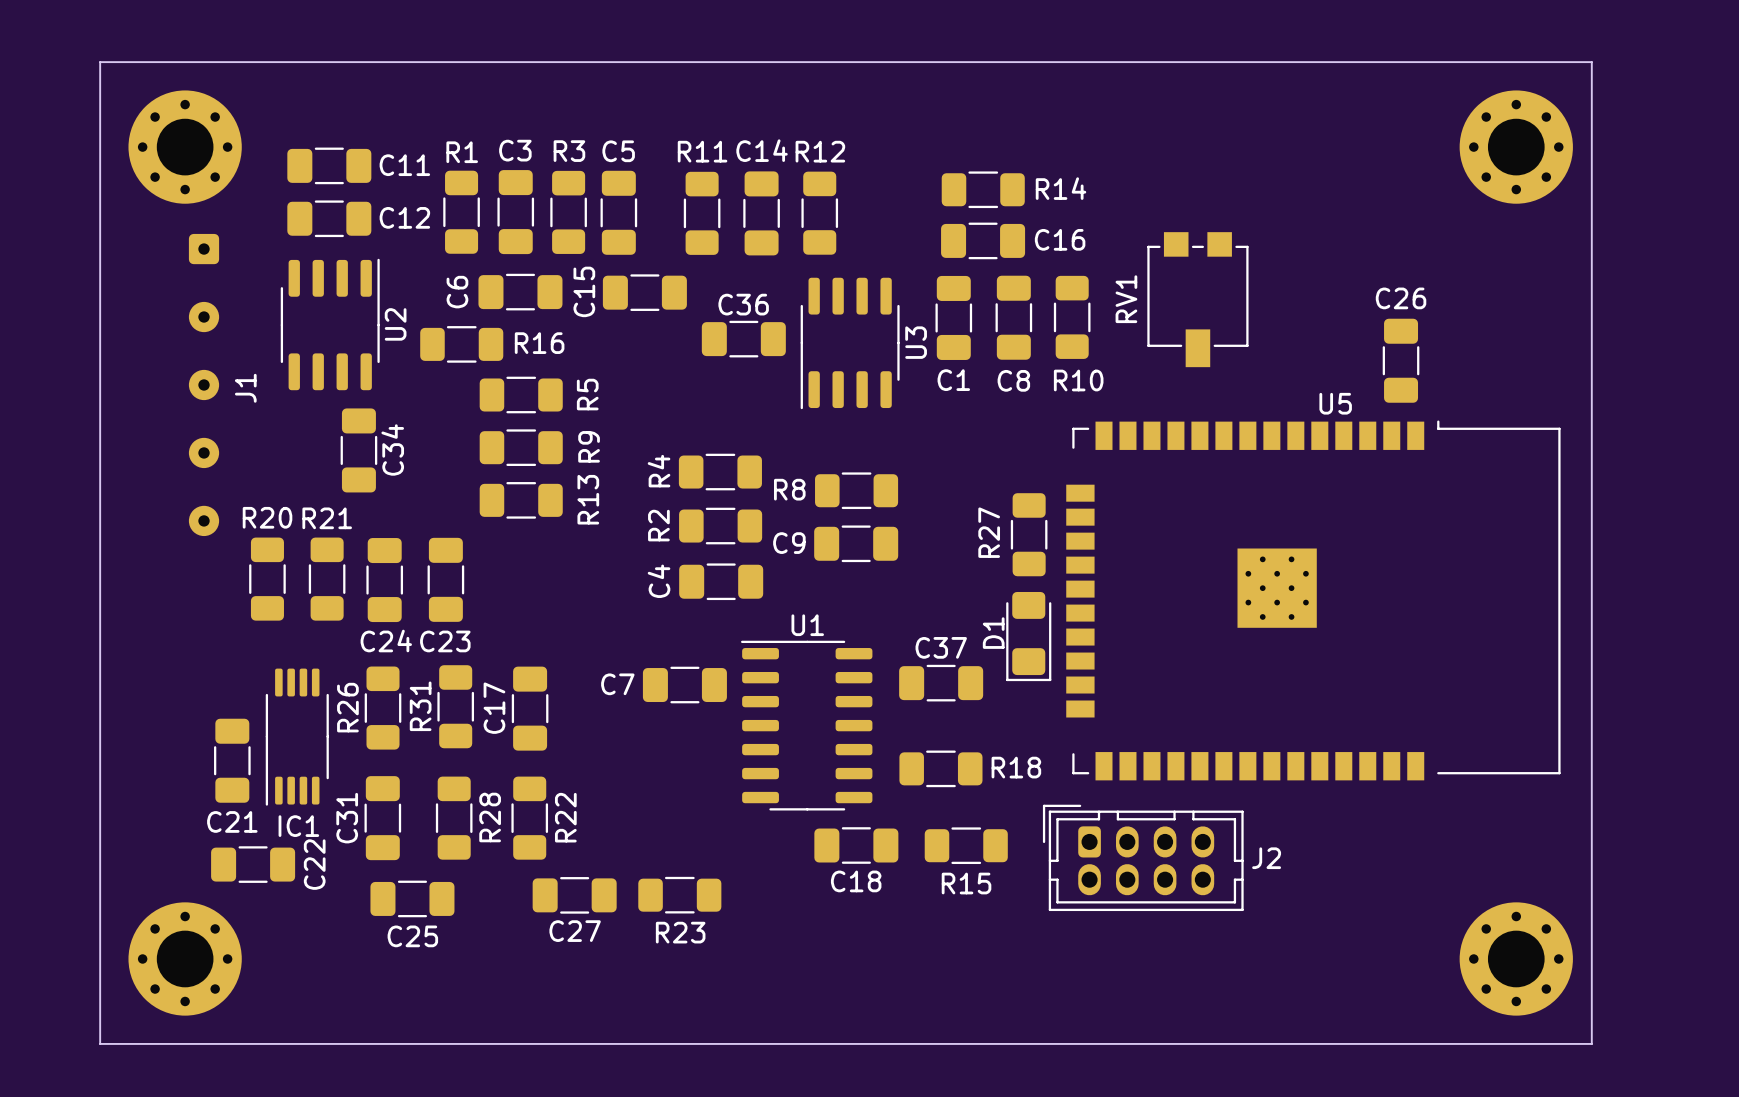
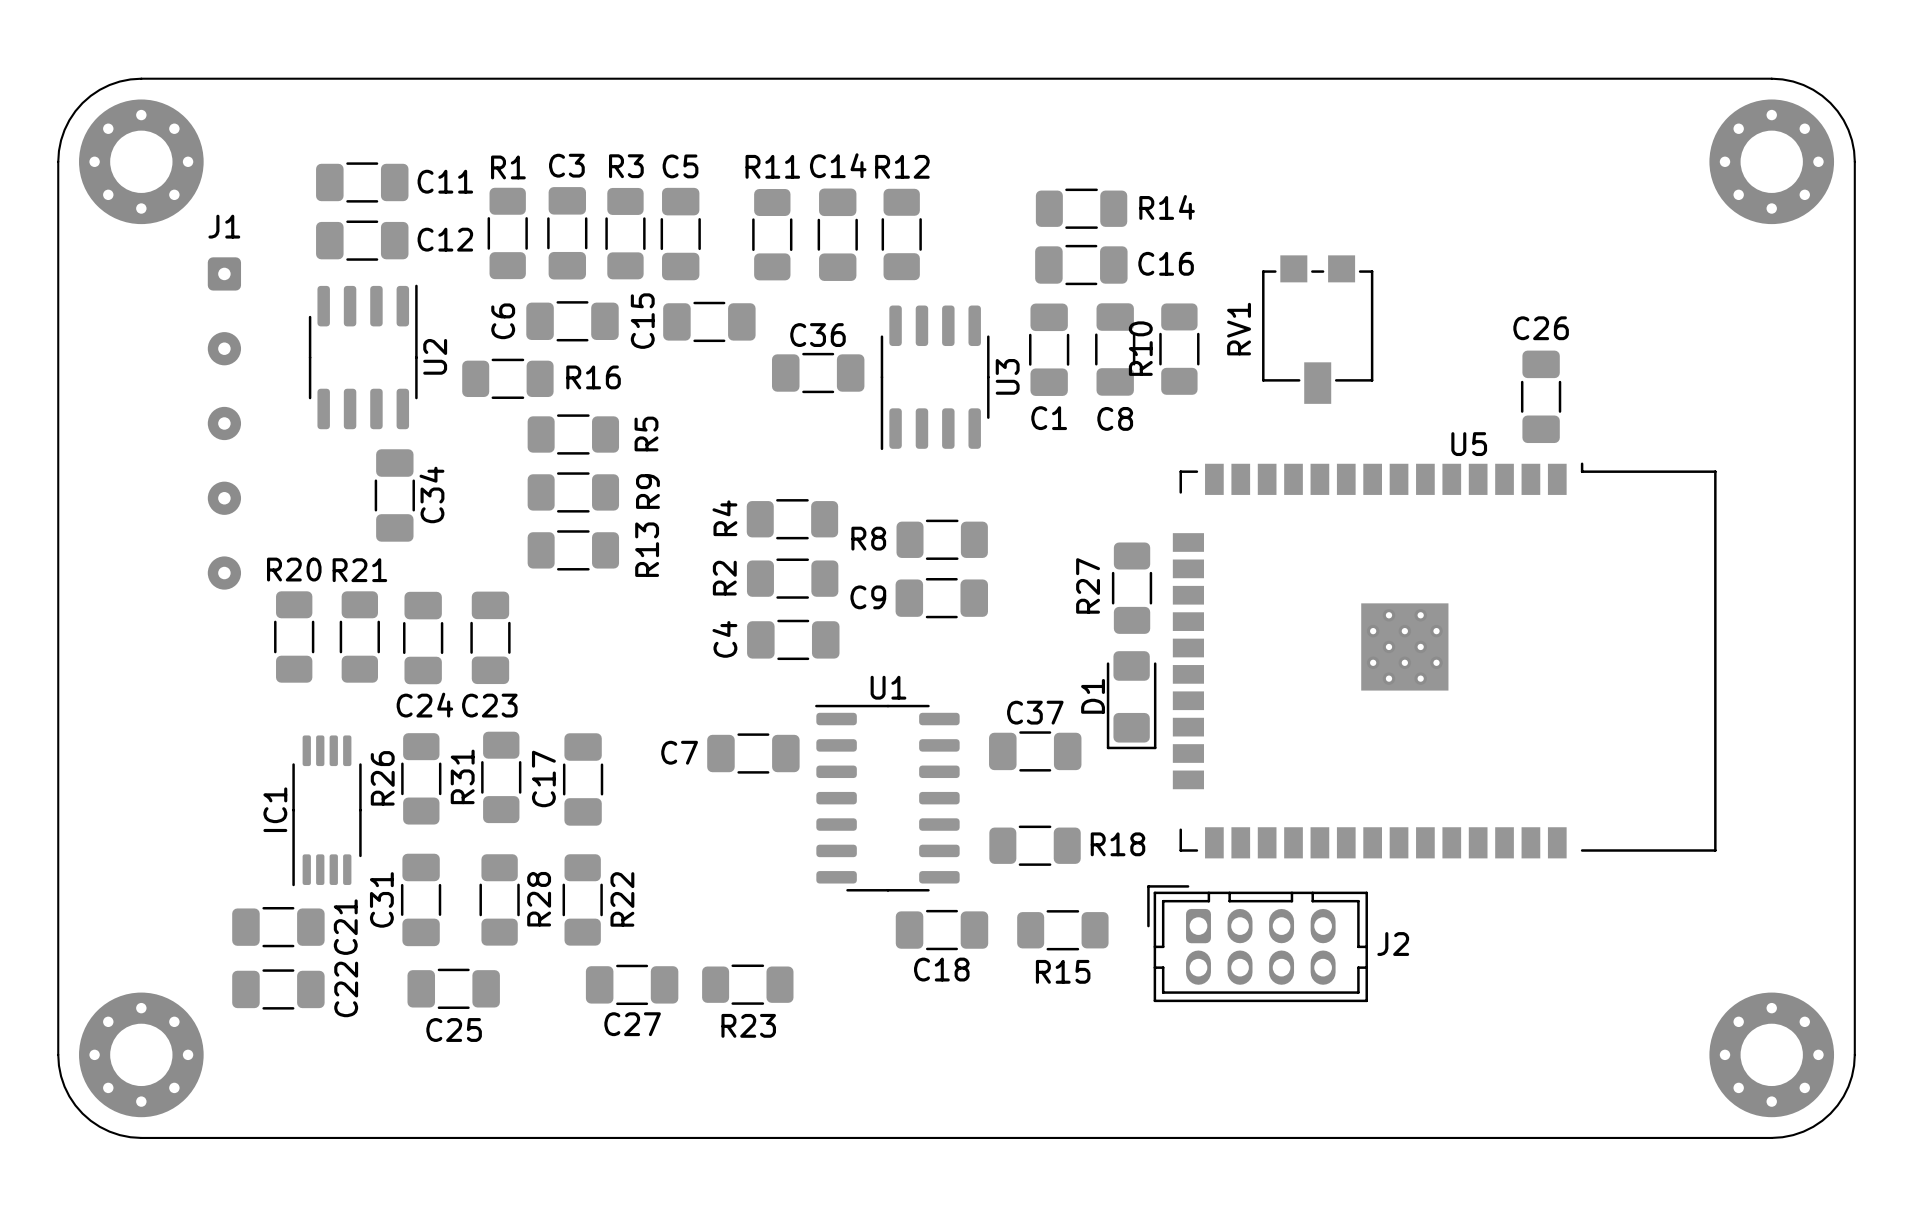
board edge: (100, 62) (1591, 62) (1591, 1043) (100, 1043) (100, 62) -> (141, 78) (109, 85) (82, 103) (64, 129) (58, 161) (58, 1054) (61, 1076) (69, 1096) (82, 1113) (99, 1126) (119, 1135) (141, 1137) (1771, 1137) (1793, 1135) (1813, 1126) (1830, 1113) (1843, 1096) (1851, 1076) (1854, 1054) (1854, 161) (1851, 140) (1843, 120) (1830, 103) (1813, 89) (1793, 81) (1771, 78) (141, 78)
part position: (185, 147) -> (141, 161)
part position: (1516, 147) -> (1771, 161)
R10 name rotation: 0° (1078, 380) -> 90° counterclockwise (1140, 348)
R10 name position: R10 (1078, 380) -> R10 (1140, 348)
J1 name rotation: 0° (245, 388) -> 90° clockwise (224, 226)
J1 name position: J1 (245, 388) -> J1 (224, 226)
C21 rotation: 0° (232, 760) -> 90° clockwise (278, 927)
C21 position: (232, 760) -> (278, 927)
C21 name position: C21 (232, 821) -> C21 (345, 927)
IC1 name rotation: 0° (298, 826) -> 90° counterclockwise (275, 809)
IC1 name position: IC1 (298, 826) -> IC1 (275, 809)
C22 position: (253, 864) -> (278, 989)
part: none -> (141, 1054)
part: (185, 958) -> none
part position: (1516, 958) -> (1771, 1054)

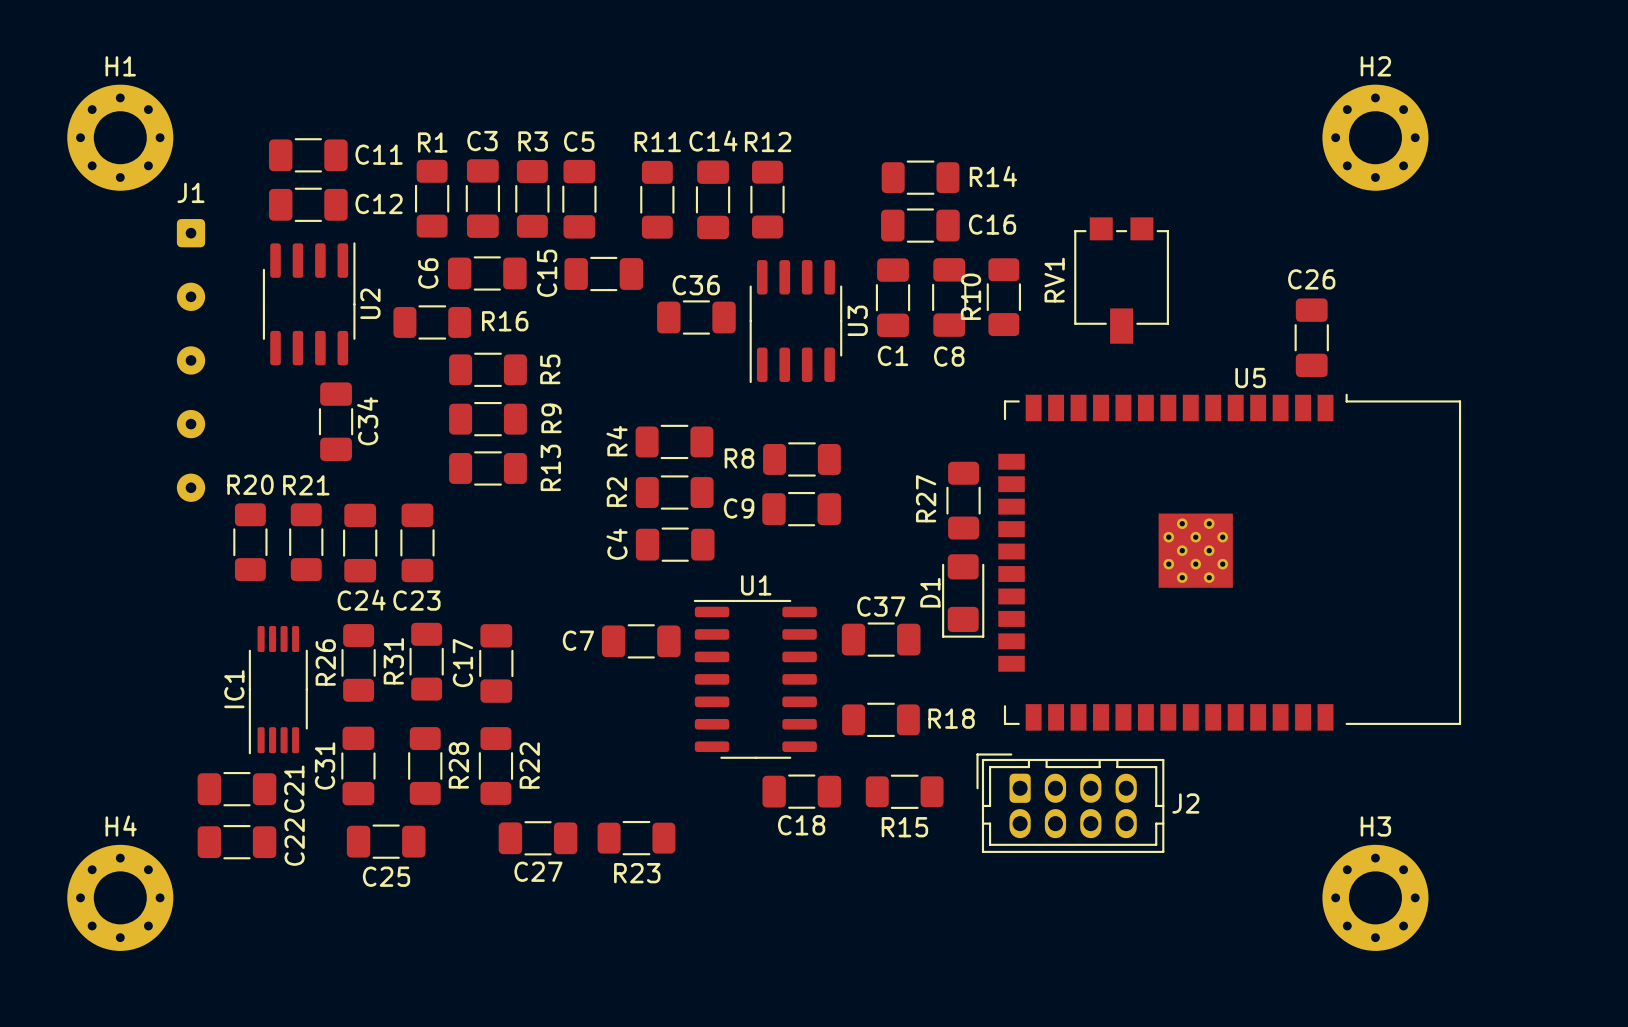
H1 name: none -> H1 (120, 66)
board edge: (141, 78) (1771, 78) (1793, 81) (1813, 89) (1830, 103) (1843, 120) (1851, 140) (1854, 161) (1854, 1054) (1851, 1076) (1843, 1096) (1830, 1113) (1813, 1126) (1793, 1135) (1771, 1137) (141, 1137) (119, 1135) (99, 1126) (82, 1113) (69, 1096) (61, 1076) (58, 1054) (58, 161) (64, 129) (82, 103) (109, 85) (141, 78) -> none
H2: none -> (1375, 137)
part: (1771, 161) -> none
H4 name: none -> H4 (121, 826)
H3: none -> (1375, 897)
part: (1771, 1054) -> none

